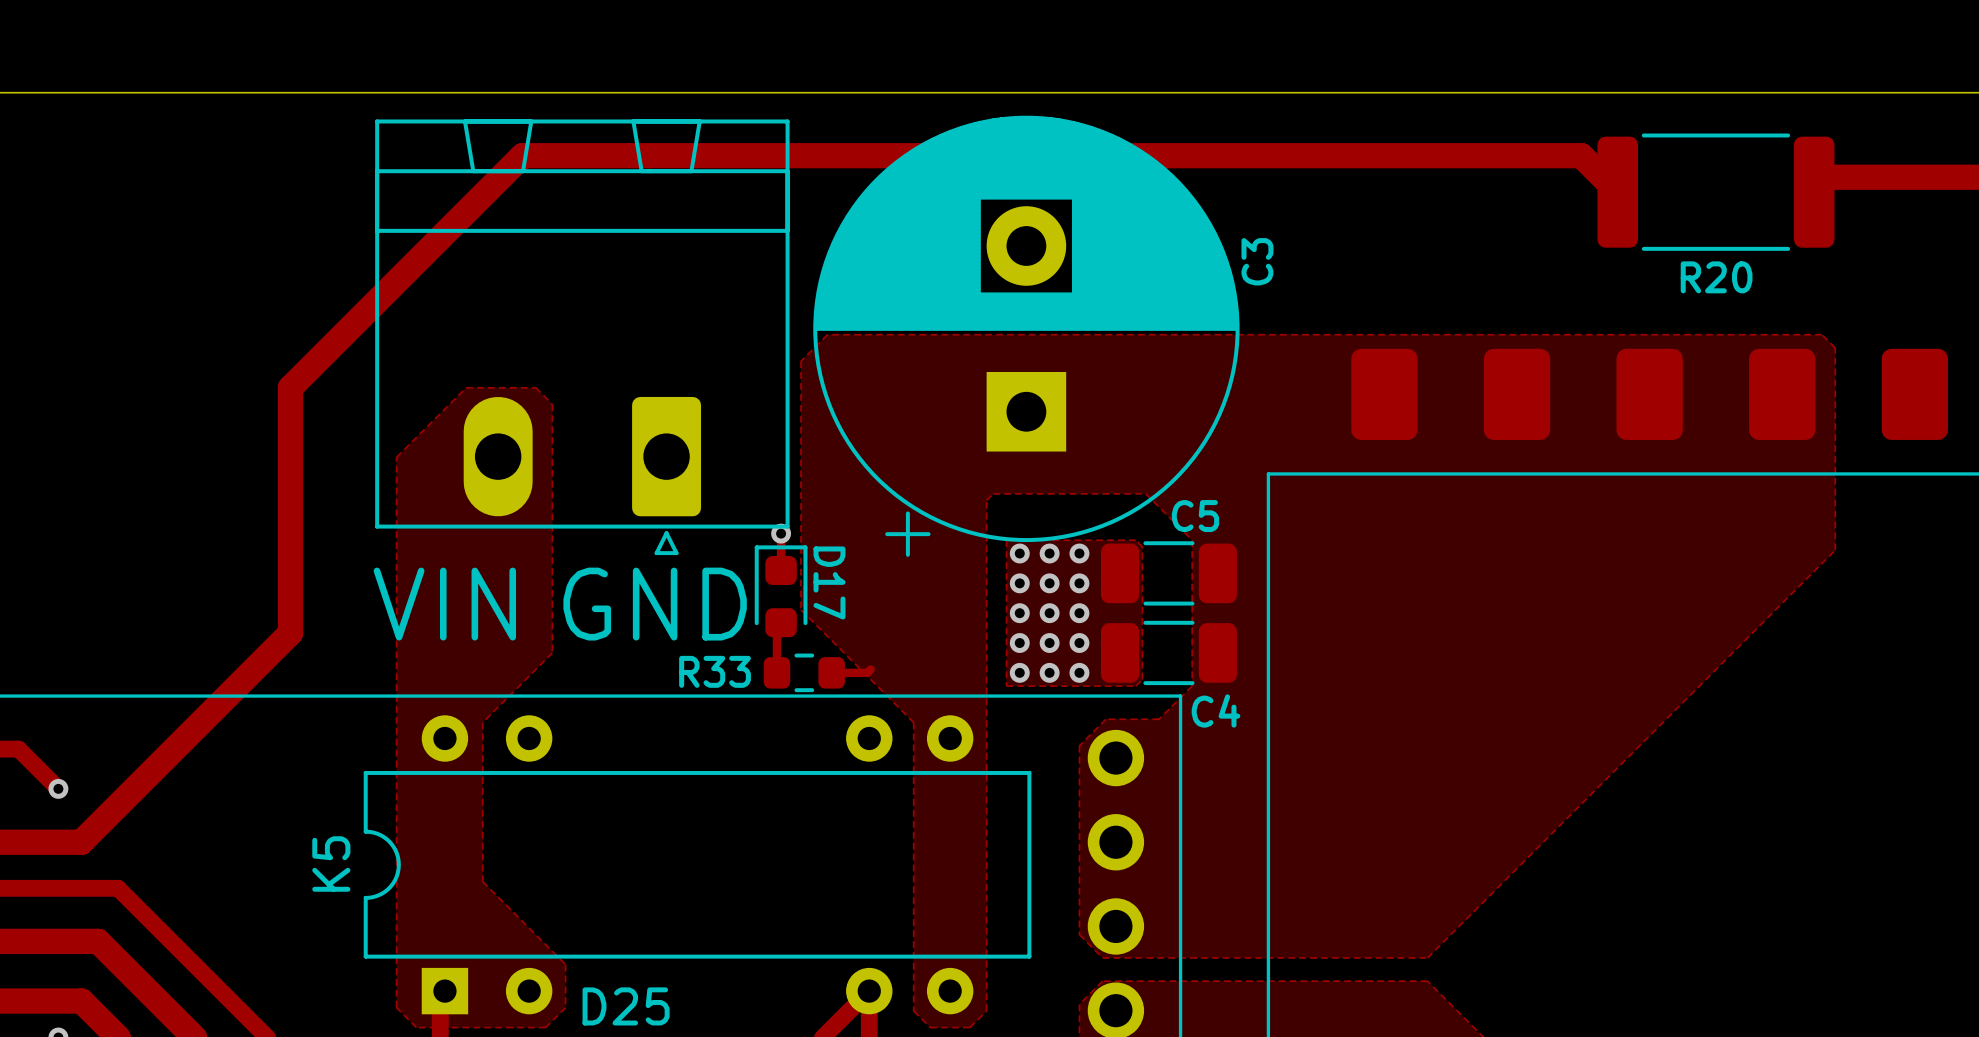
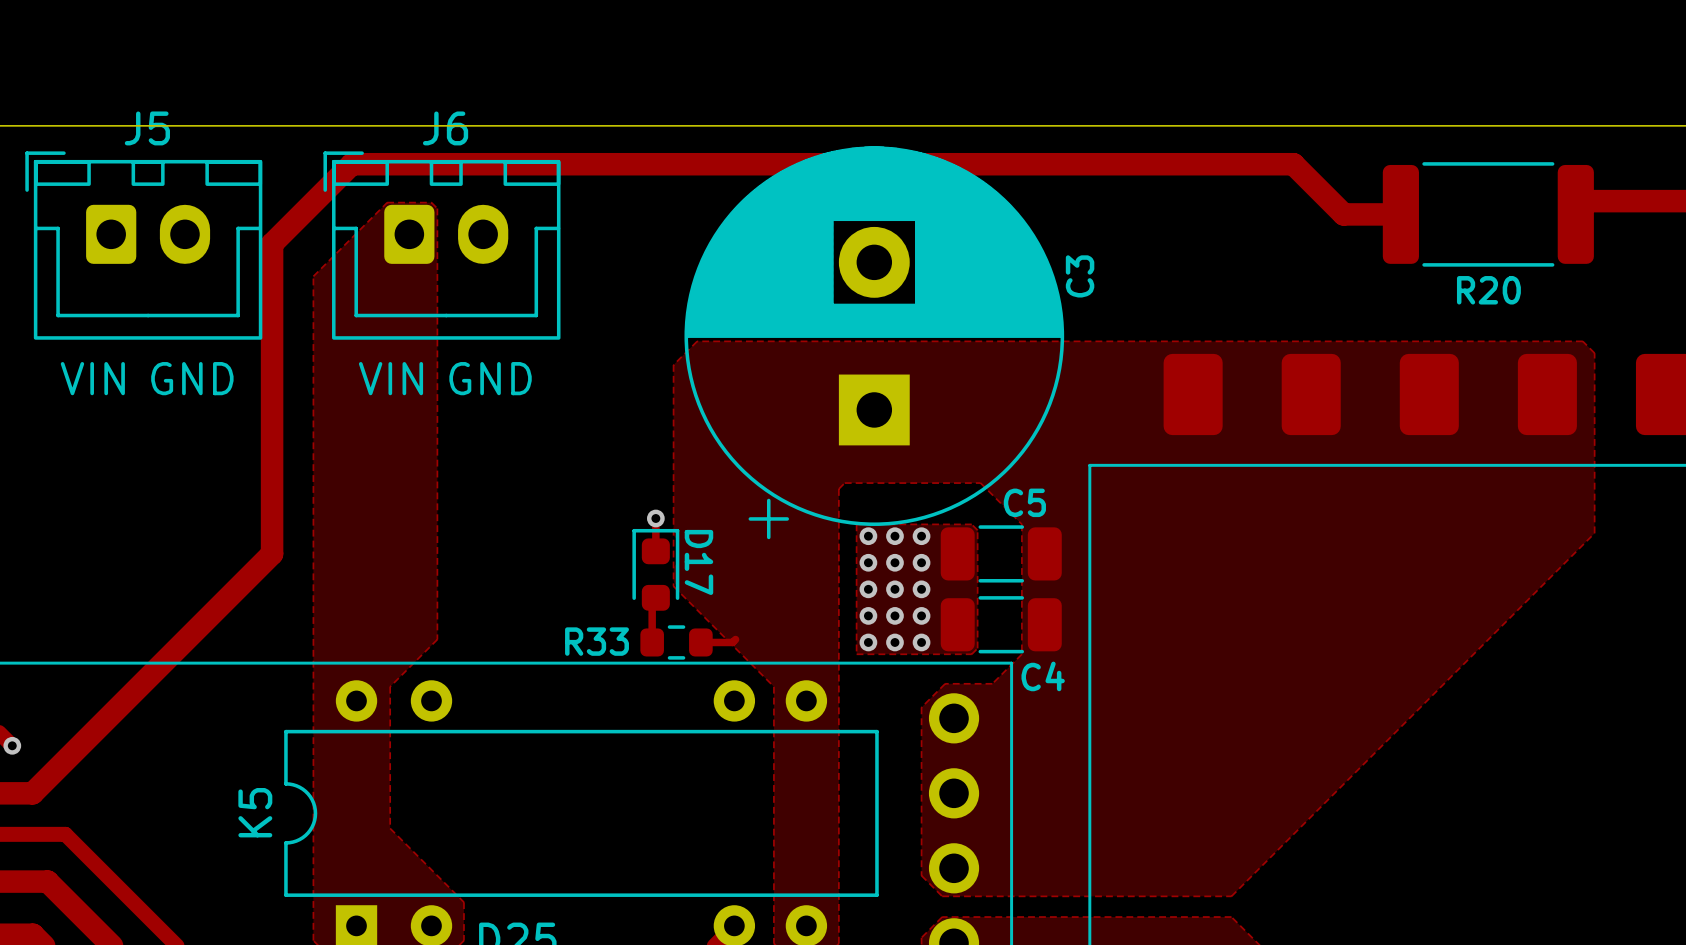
track: (1617, 192) (1581, 155) (522, 155) (290, 387) (290, 633) -> (1400, 214) (1343, 214) (1293, 164) (351, 164) (272, 243) (272, 553) (218, 607)
J5: none -> (143, 245)
J6: none -> (441, 245)
part: (582, 337) -> none
text: none -> VIN (92, 378)
text: none -> GND (192, 378)
text: none -> VIN (391, 378)
text: none -> GND (490, 378)
zone outline: (396, 457) (466, 387) (535, 387) (552, 404) (552, 652) (535, 669) -> (313, 450) (313, 276) (387, 202) (431, 202) (437, 208) (437, 639)
text: VIN (444, 604) -> none
text: GND (655, 604) -> none

